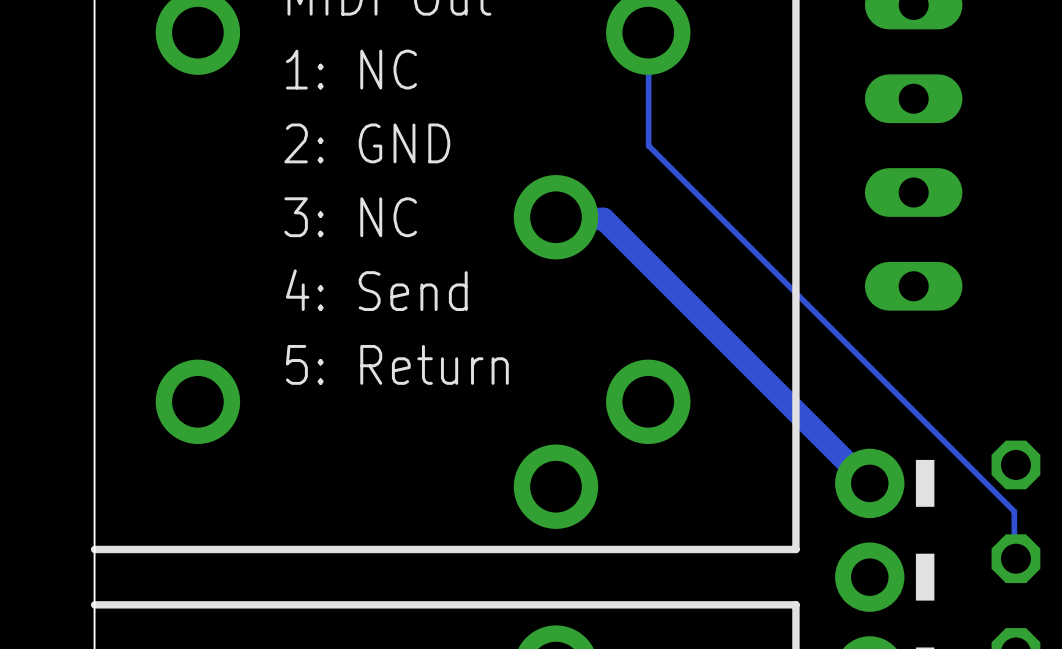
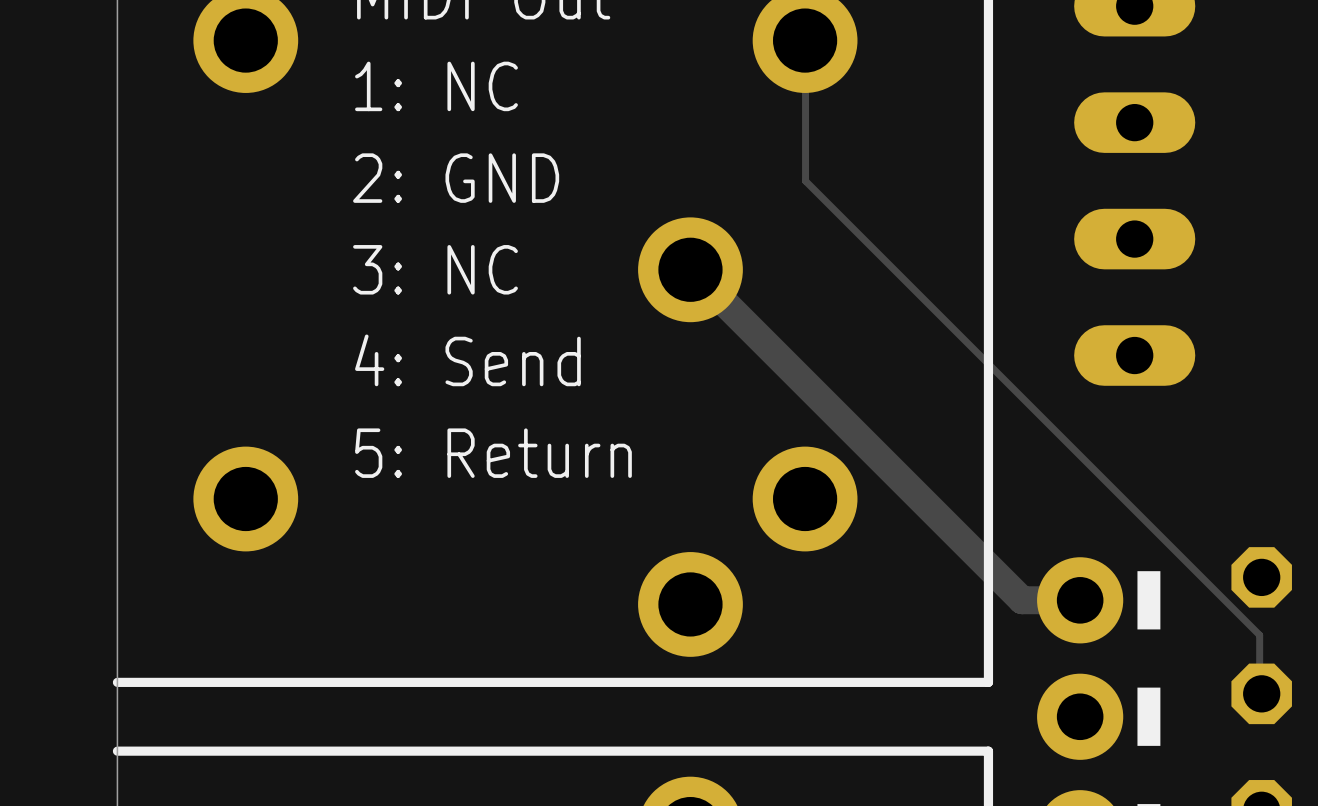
track: (558, 218) (603, 218) (868, 483) -> (693, 271) (1022, 600) (1078, 600)

